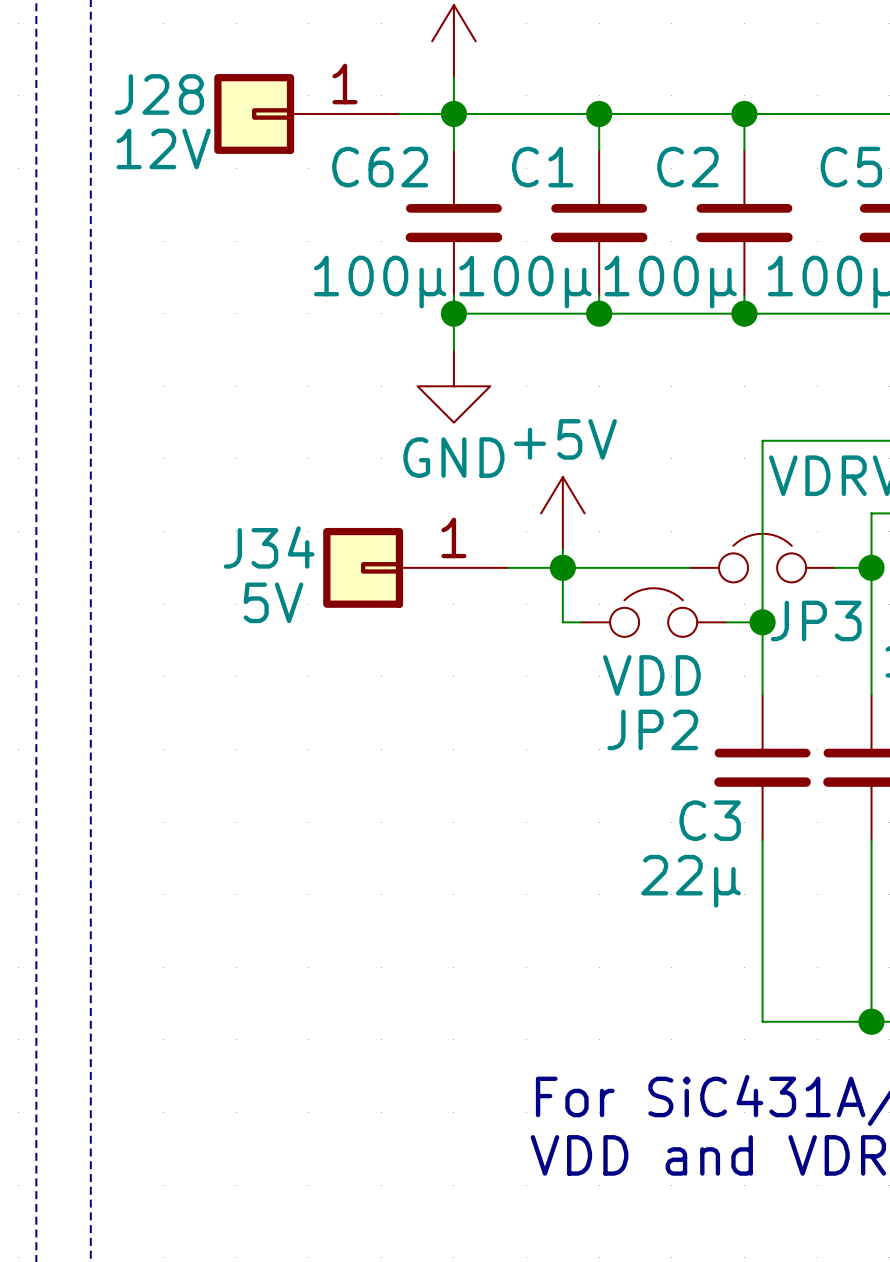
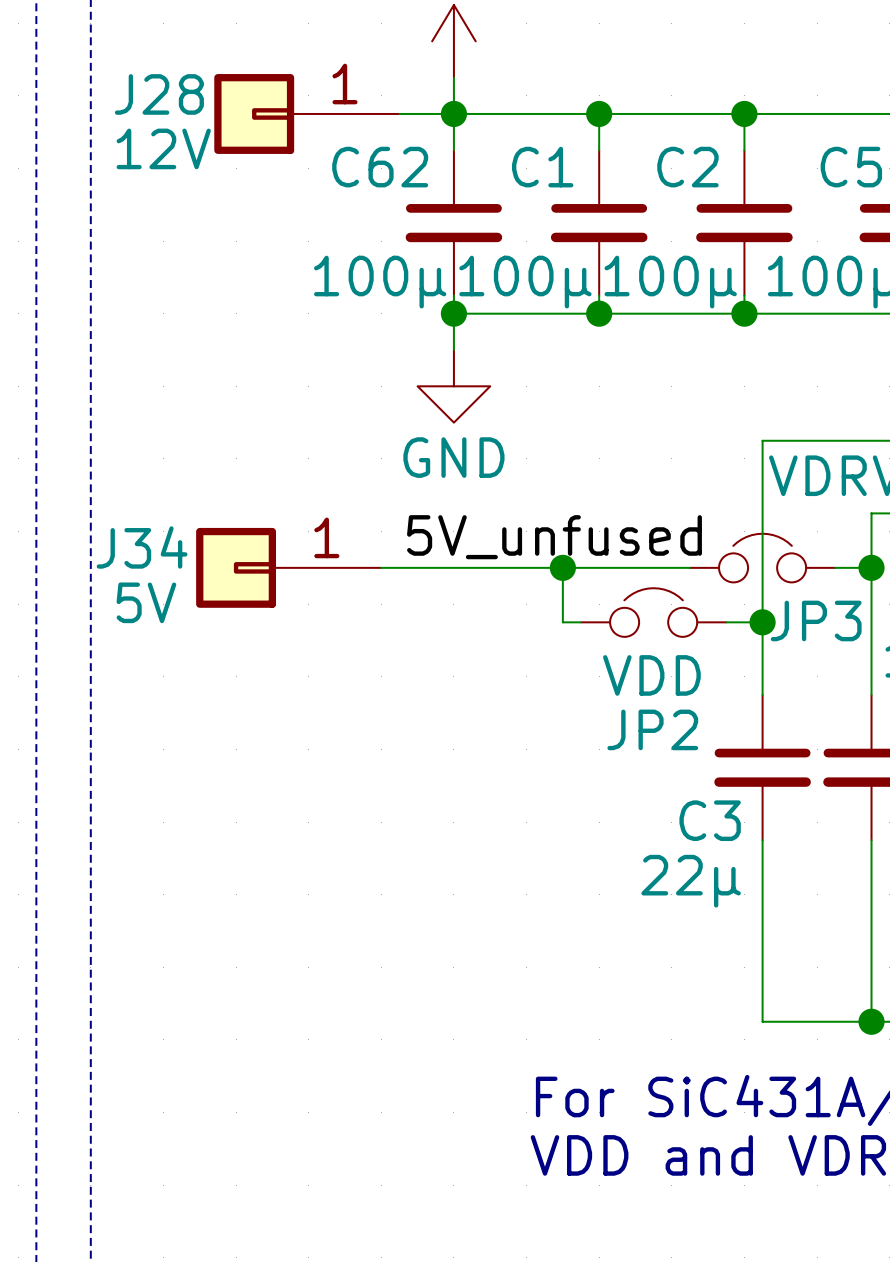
power symbol: +5V (562, 513) -> none
label: none -> 5V_unfused (554, 537)
J34 position: (415, 567) -> (288, 567)

